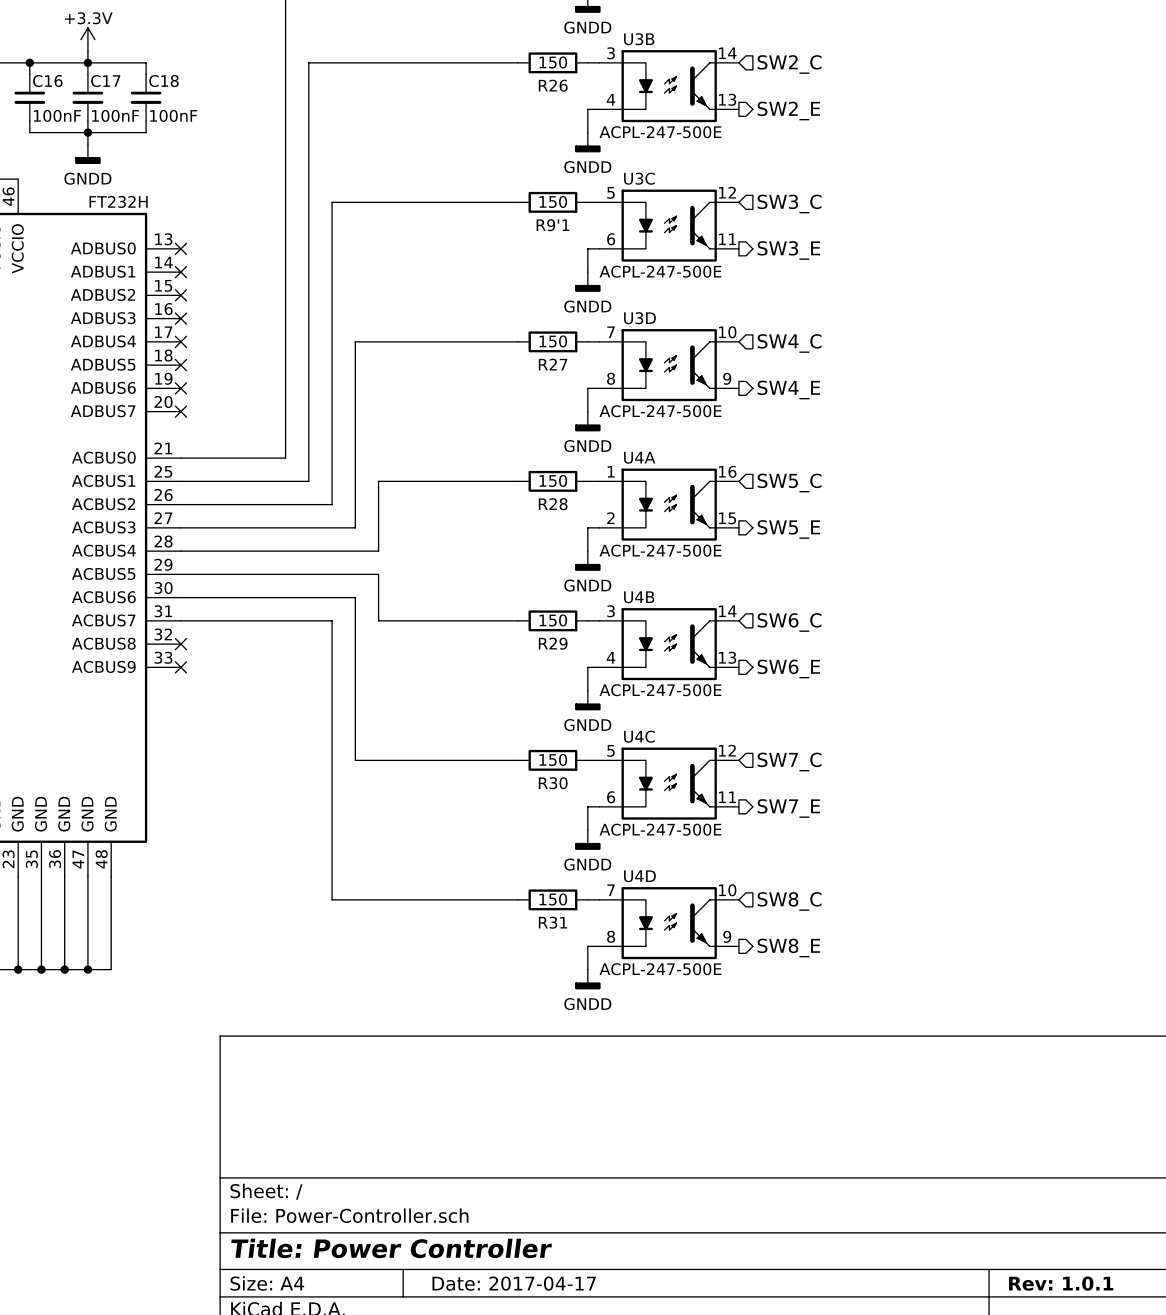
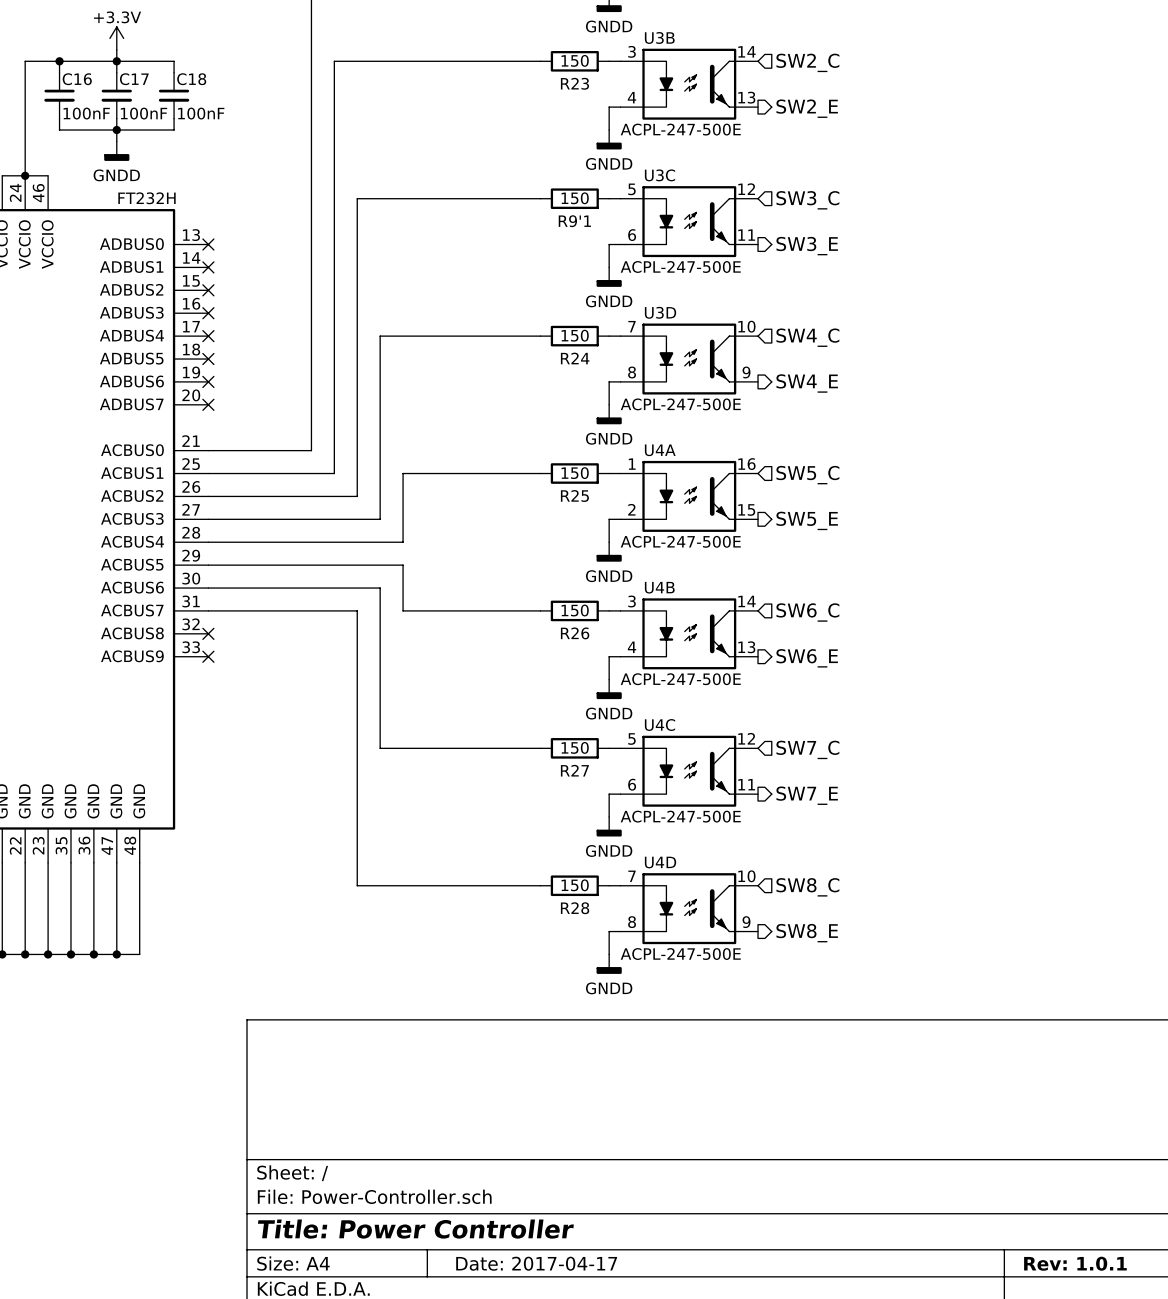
R26 name: R26 (553, 85) -> R23 (574, 83)
R27 name: R27 (553, 364) -> R24 (575, 358)
R28 name: R28 (553, 504) -> R25 (574, 496)
R29 name: R29 (553, 643) -> R26 (575, 633)
R30 name: R30 (553, 783) -> R27 (574, 770)
R31 name: R31 (552, 922) -> R28 (575, 908)

